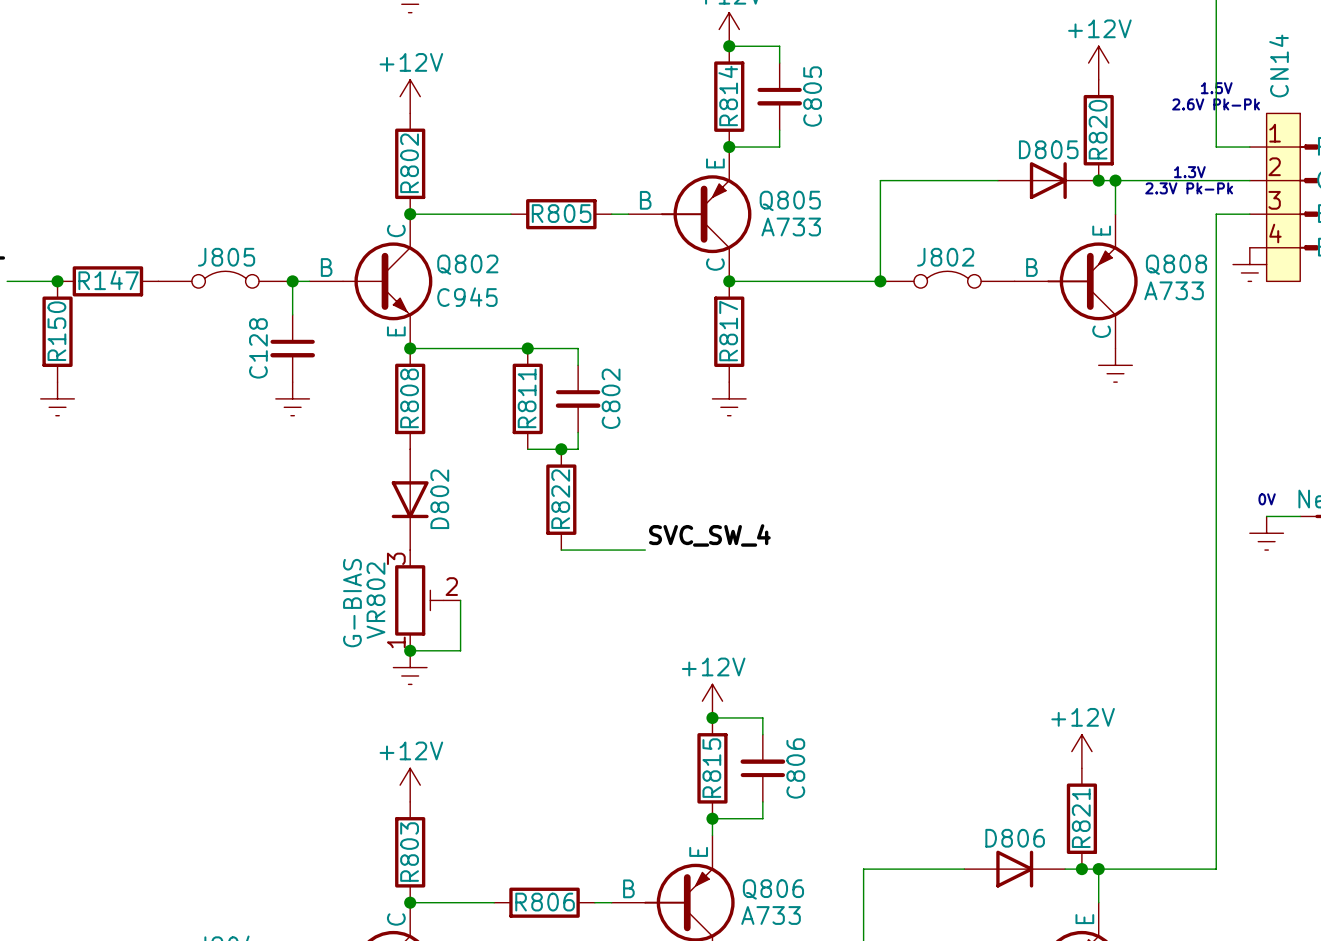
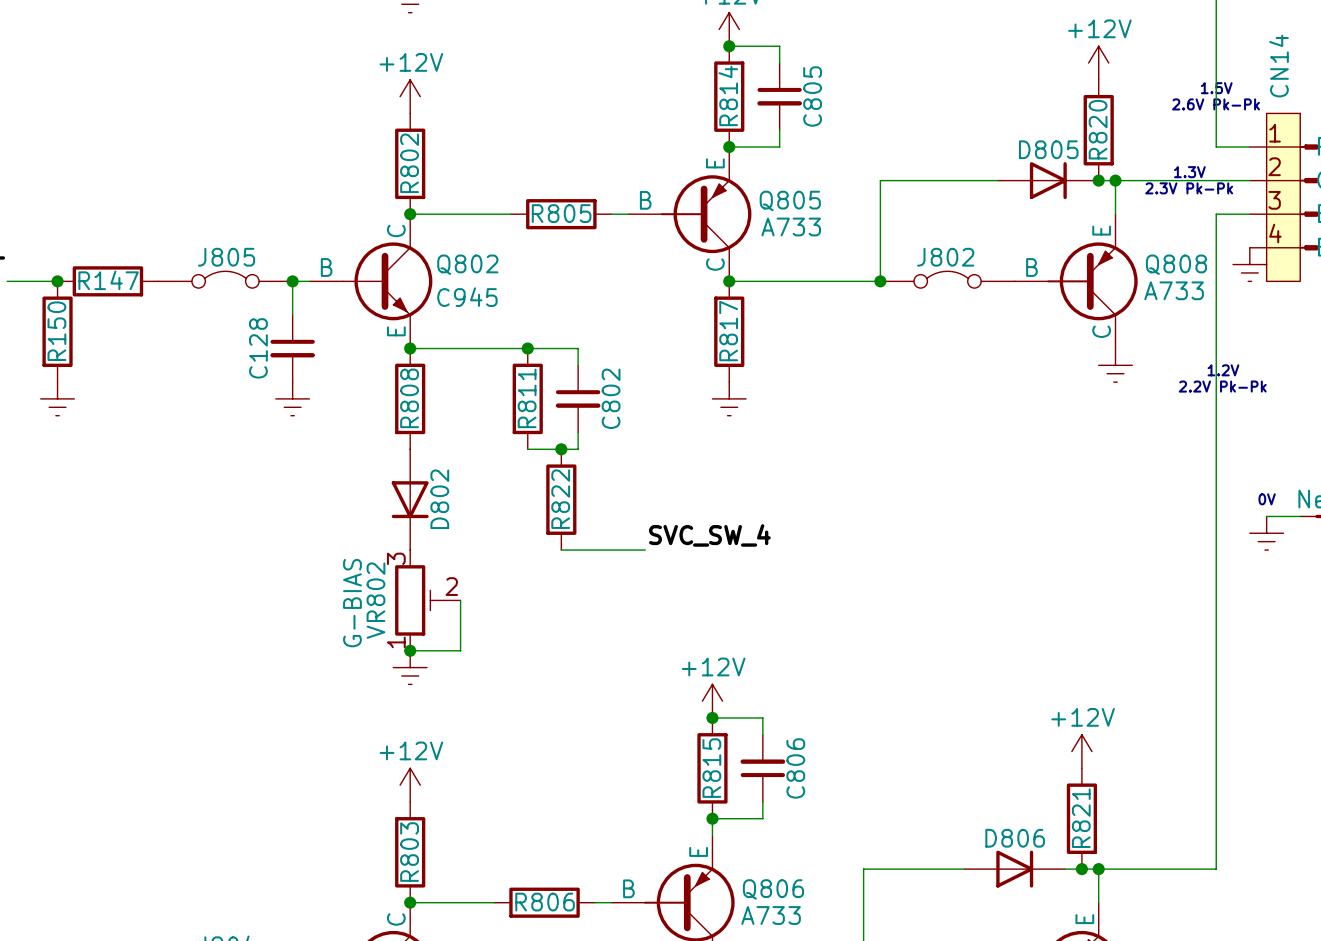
text: none -> 1.2V (1223, 370)
text: none -> 2.2V Pk-Pk (1222, 386)

